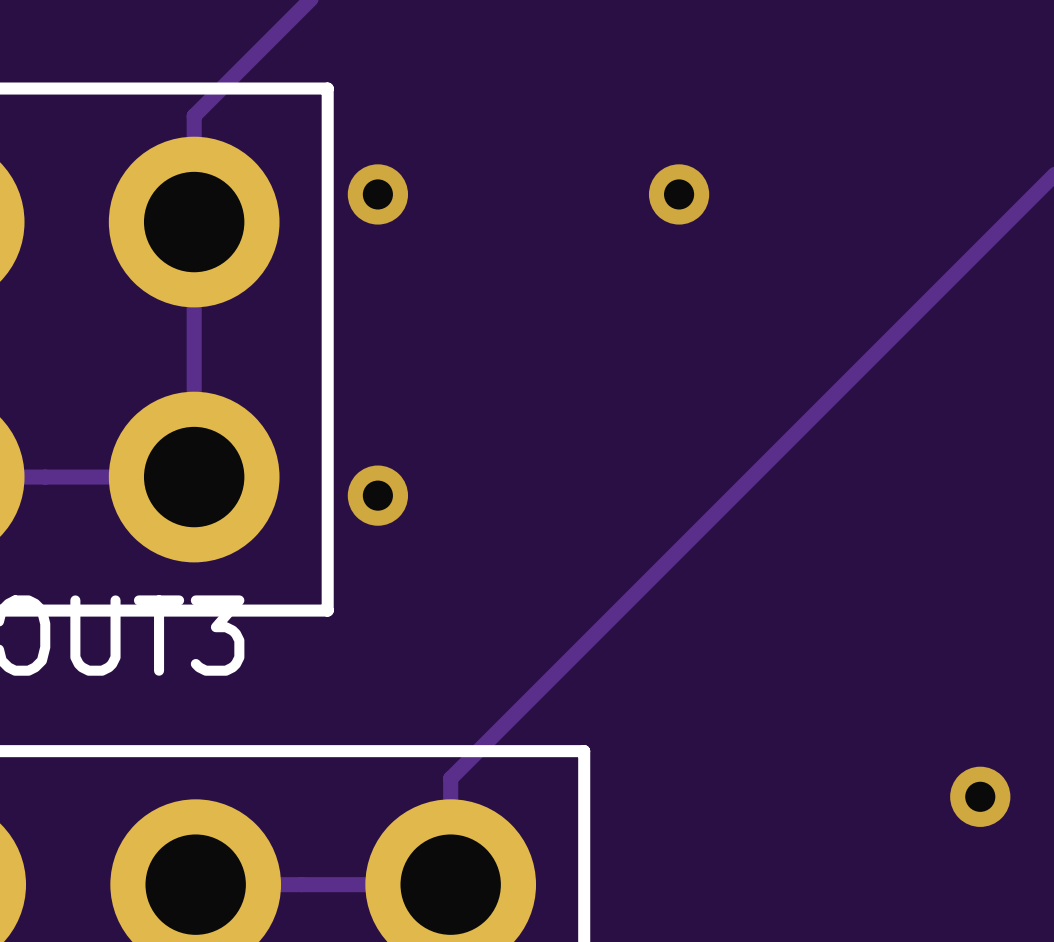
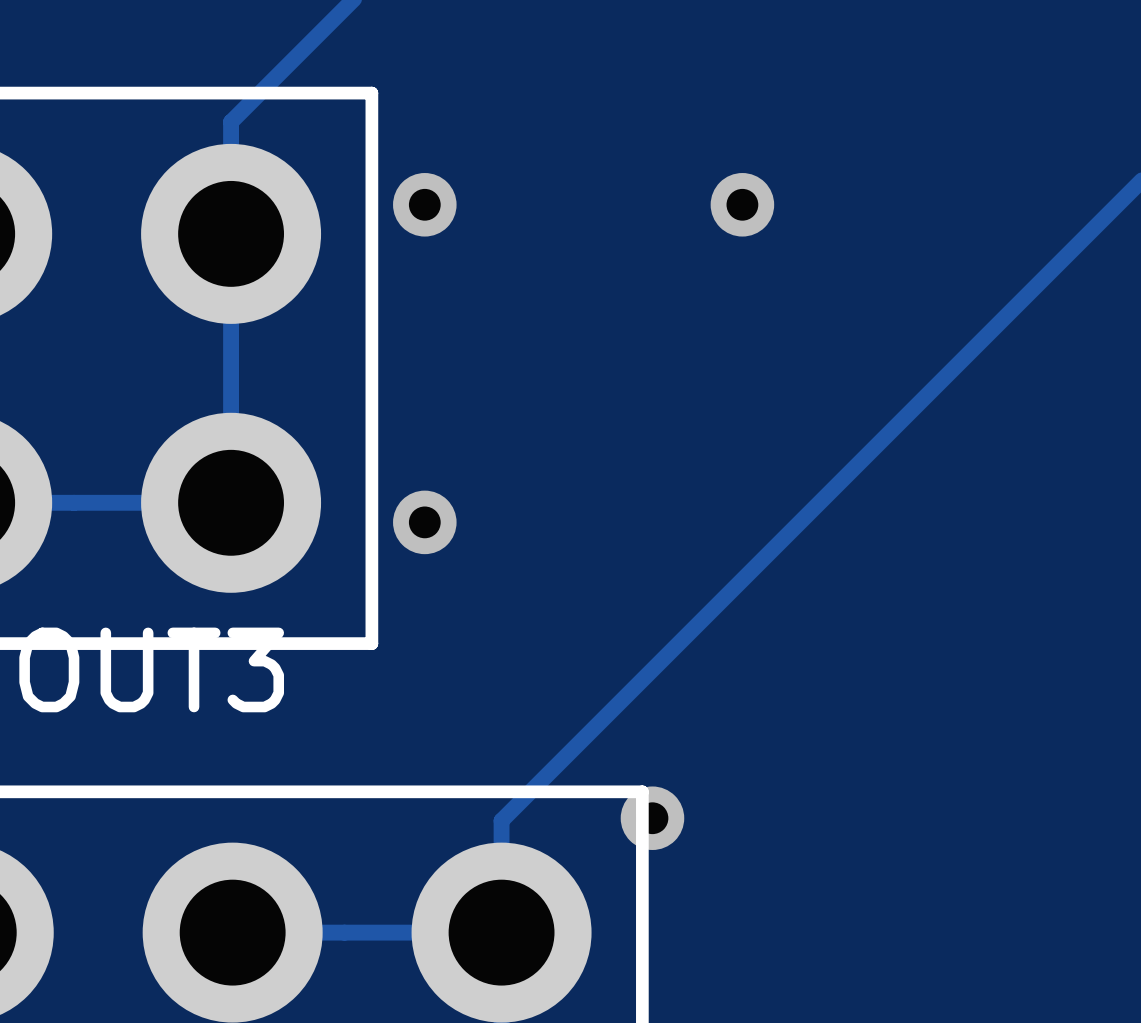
via: none -> (652, 818)
via: (980, 796) -> none

